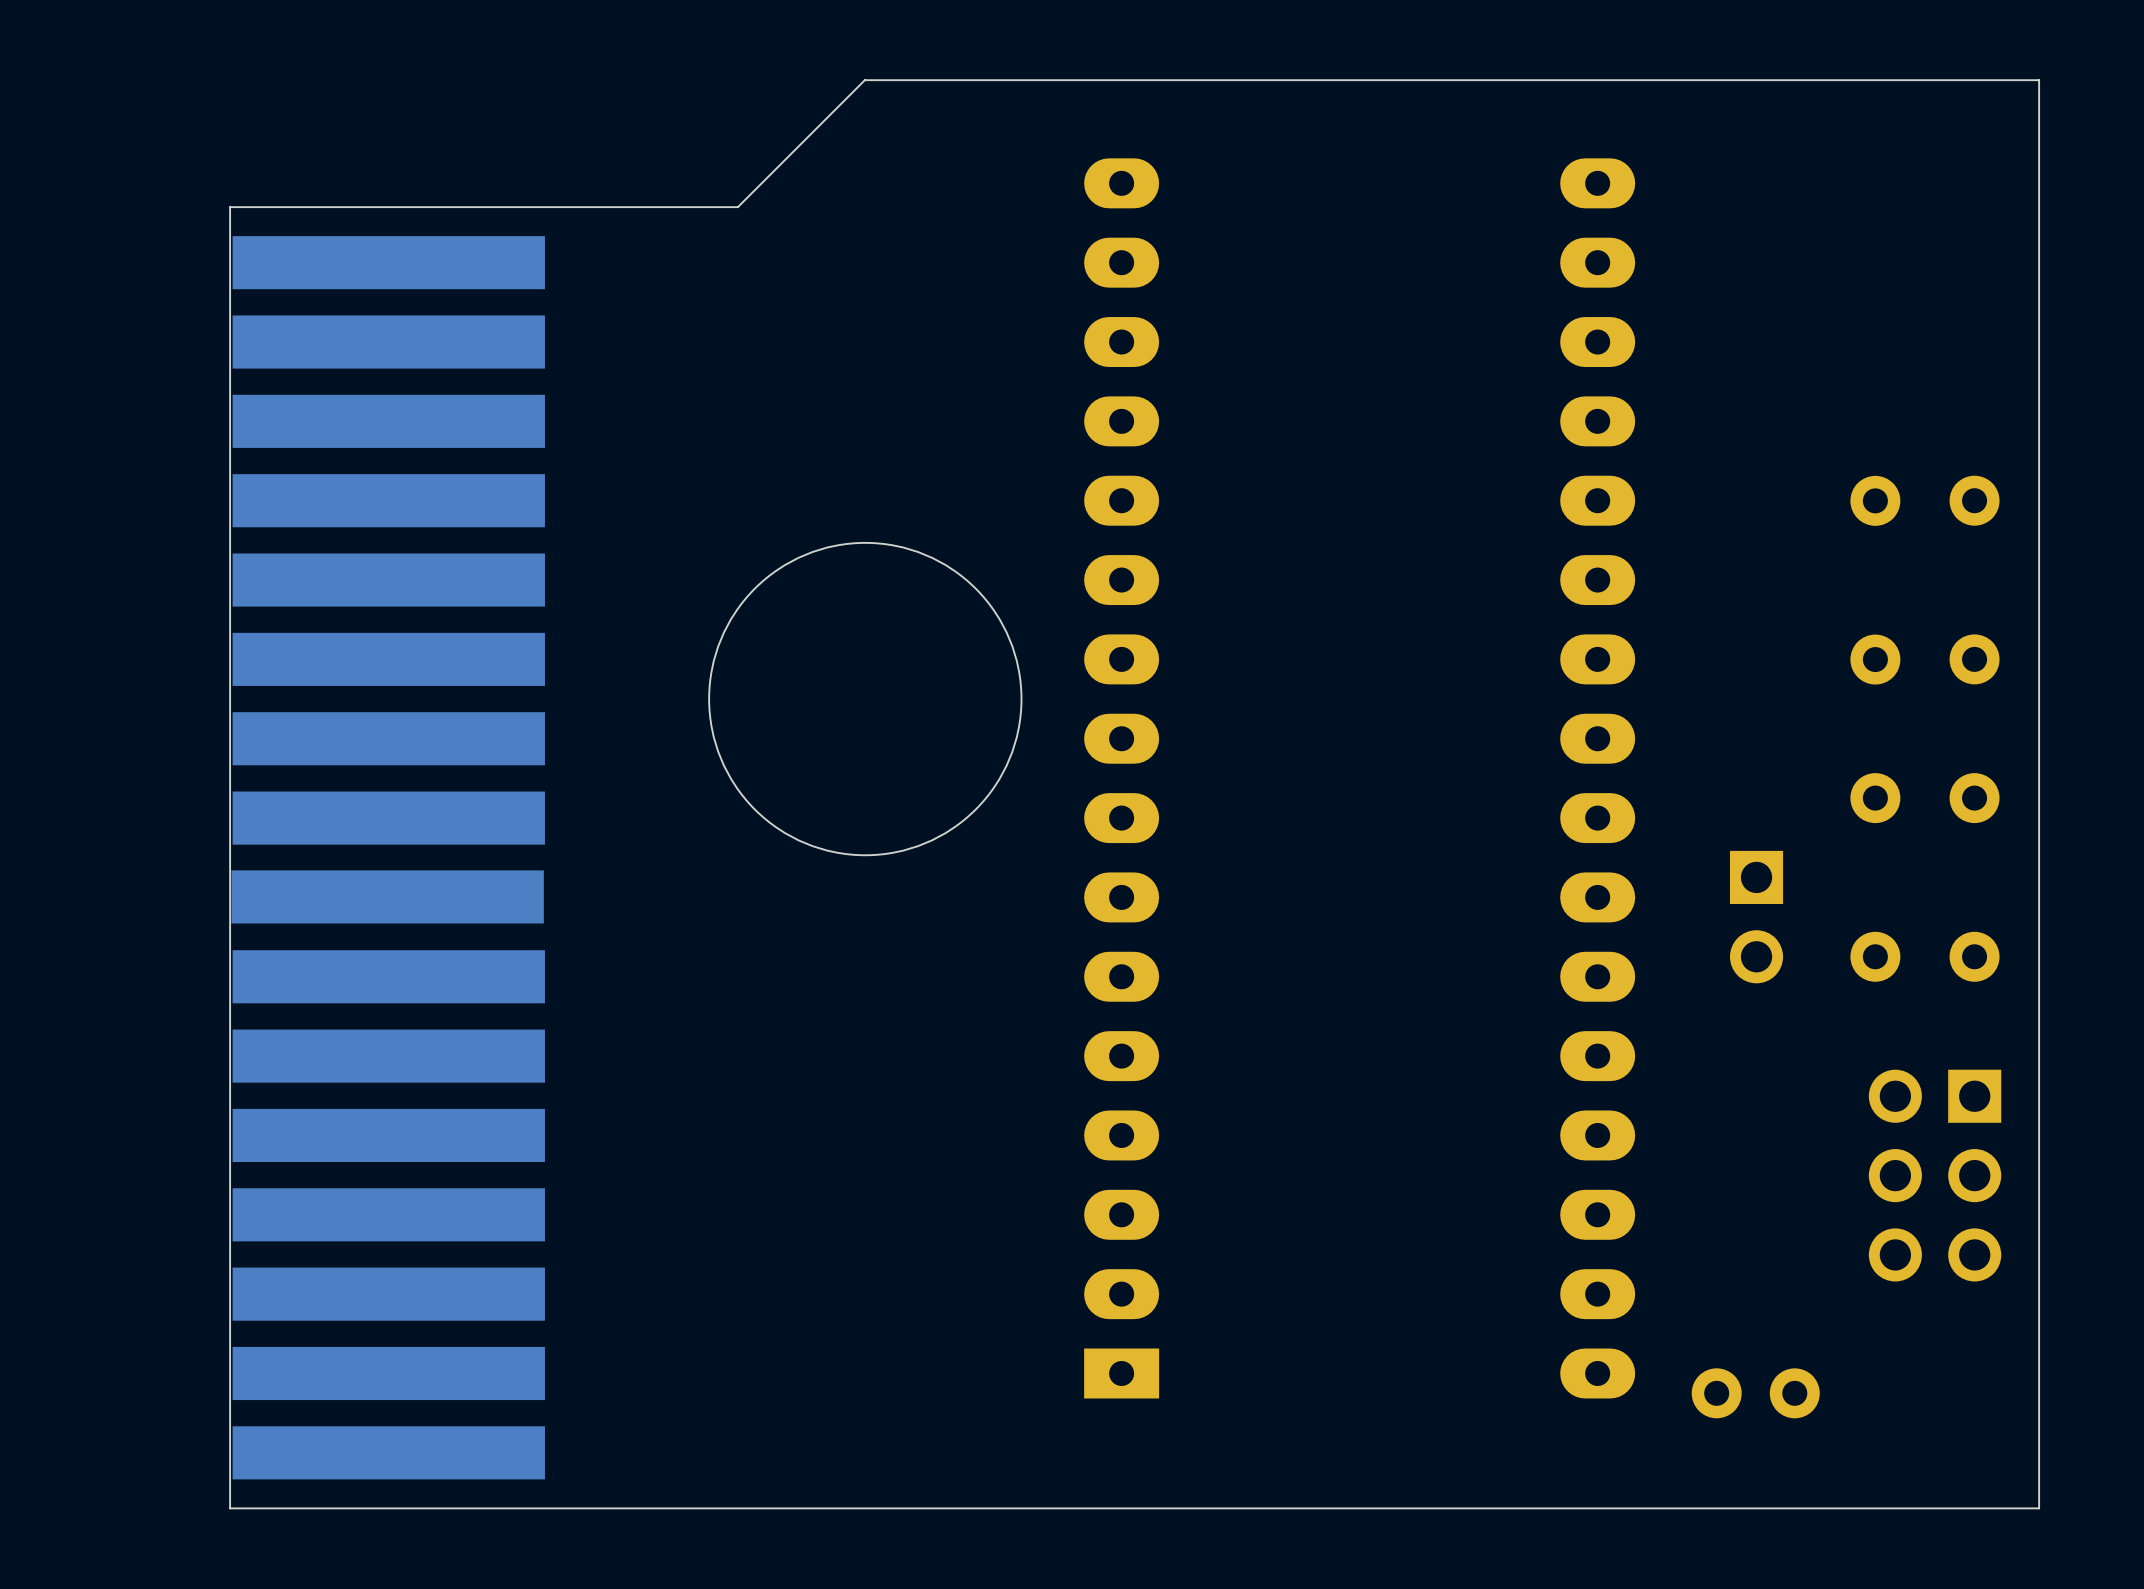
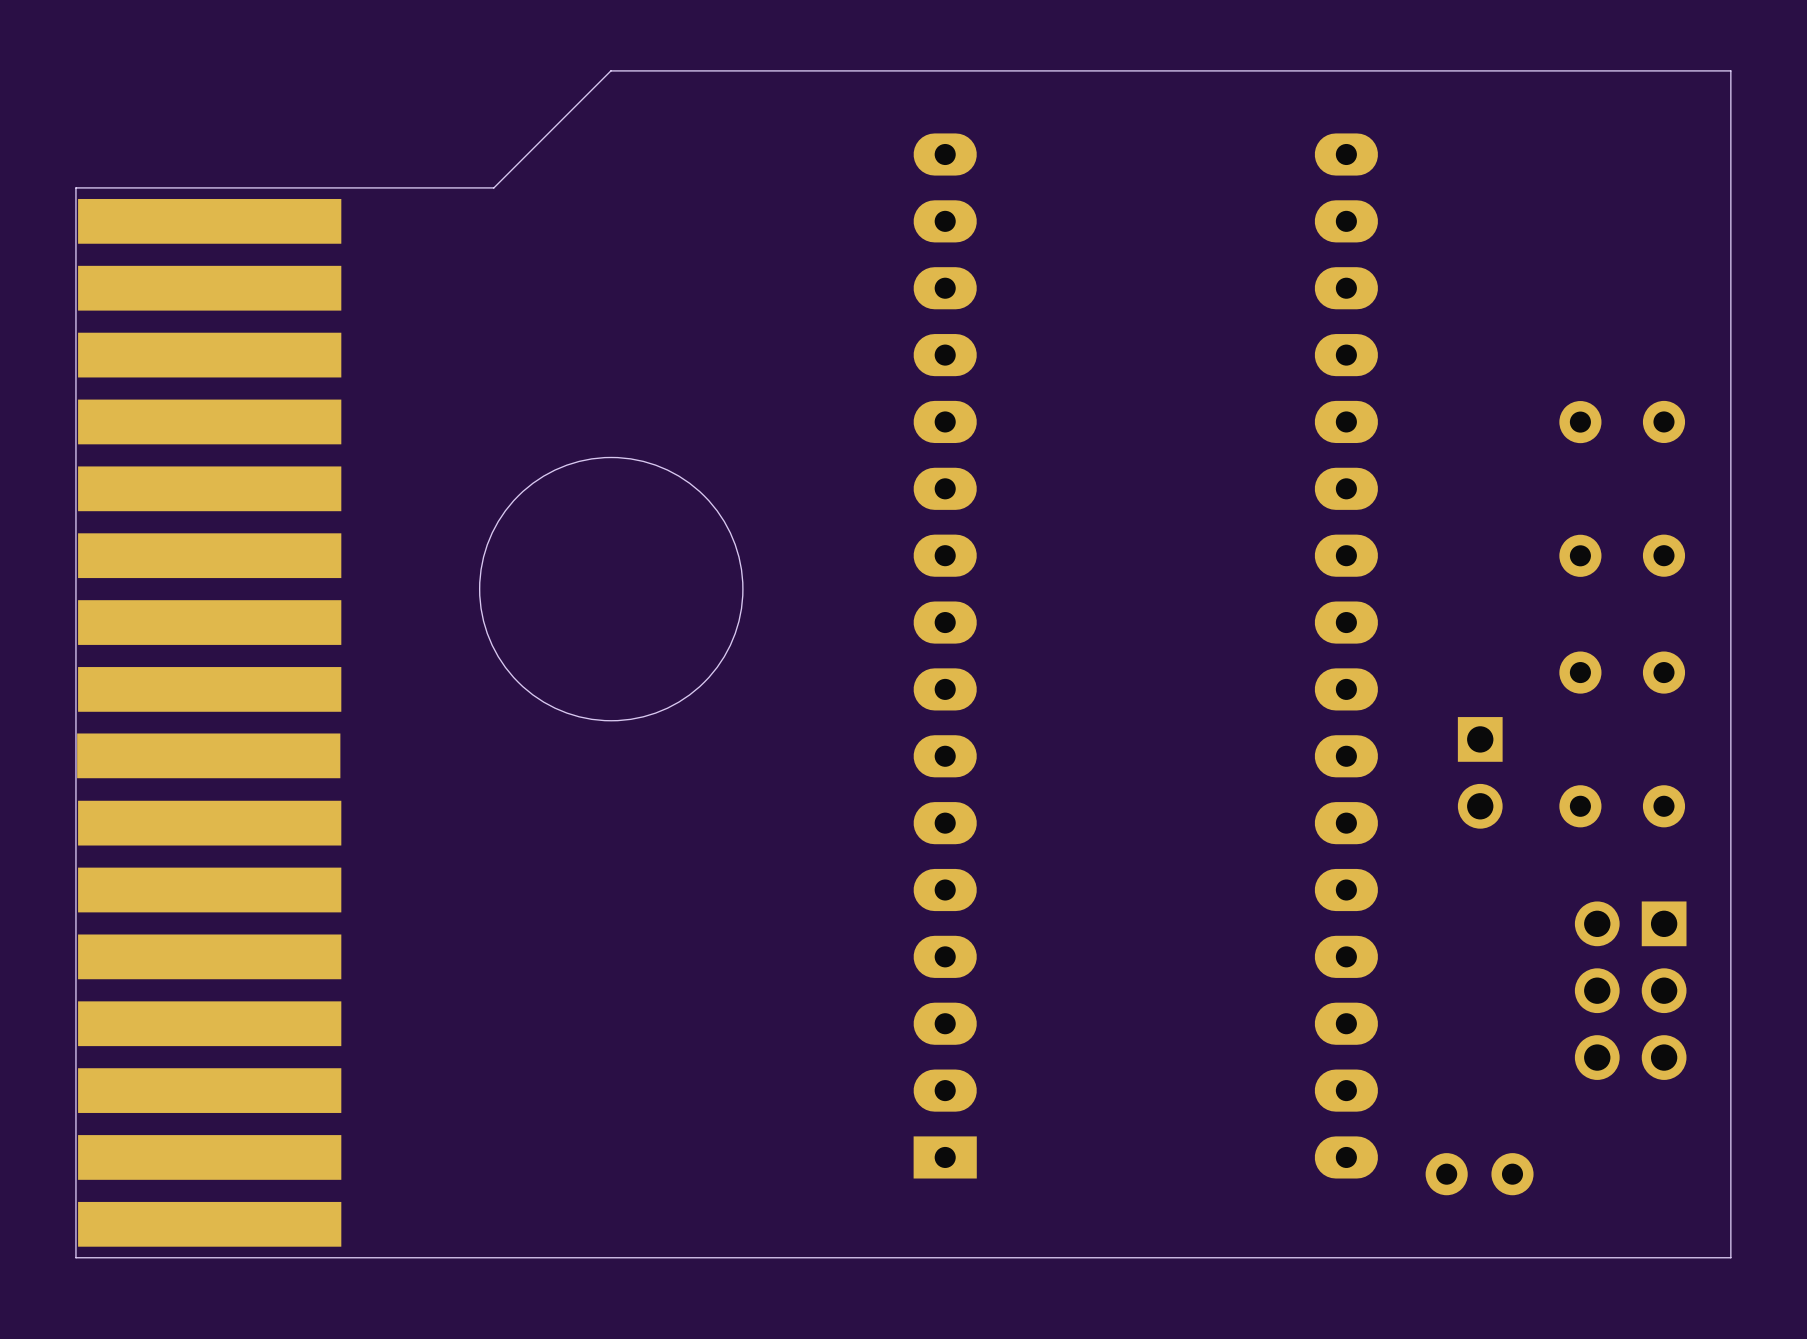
board edge: (2039, 80) (2039, 1508) (230, 1508) (230, 207) (737, 207) (864, 80) (2039, 80) -> (1730, 70) (1730, 1257) (75, 1257) (75, 187) (493, 187) (610, 70) (1730, 70)
round board edge position: (865, 699) -> (611, 589)
part position: (388, 857) -> (209, 722)

